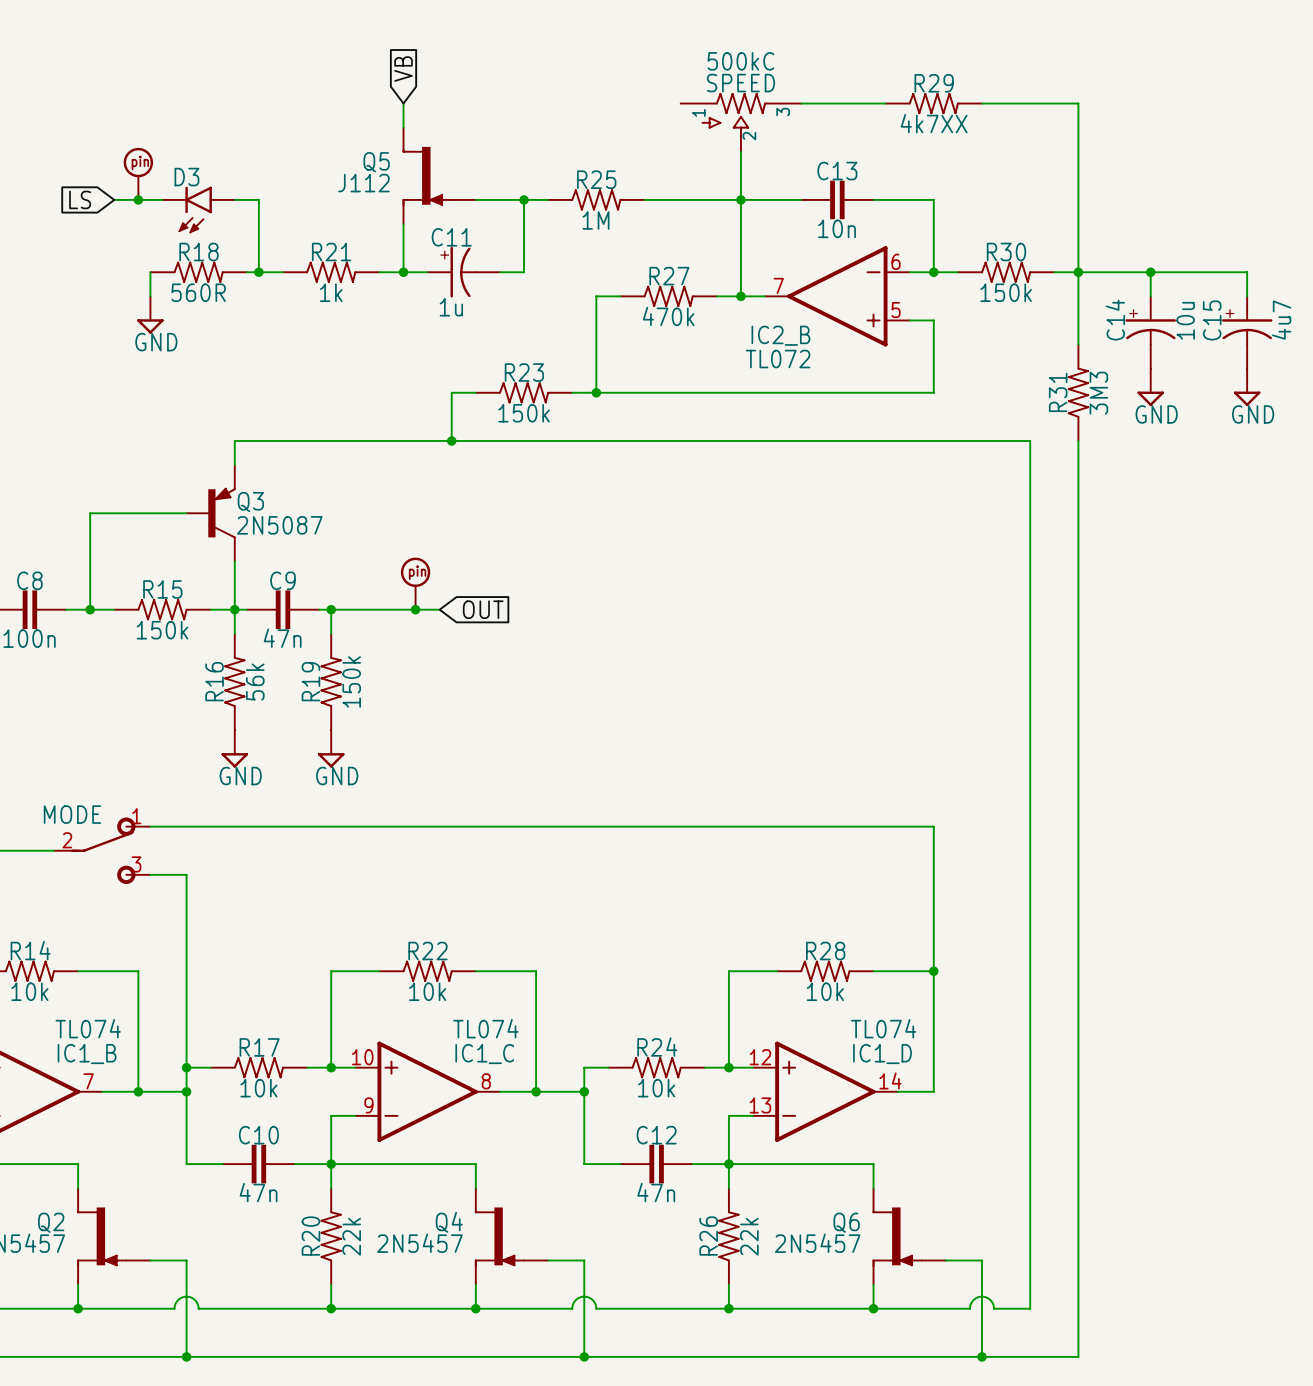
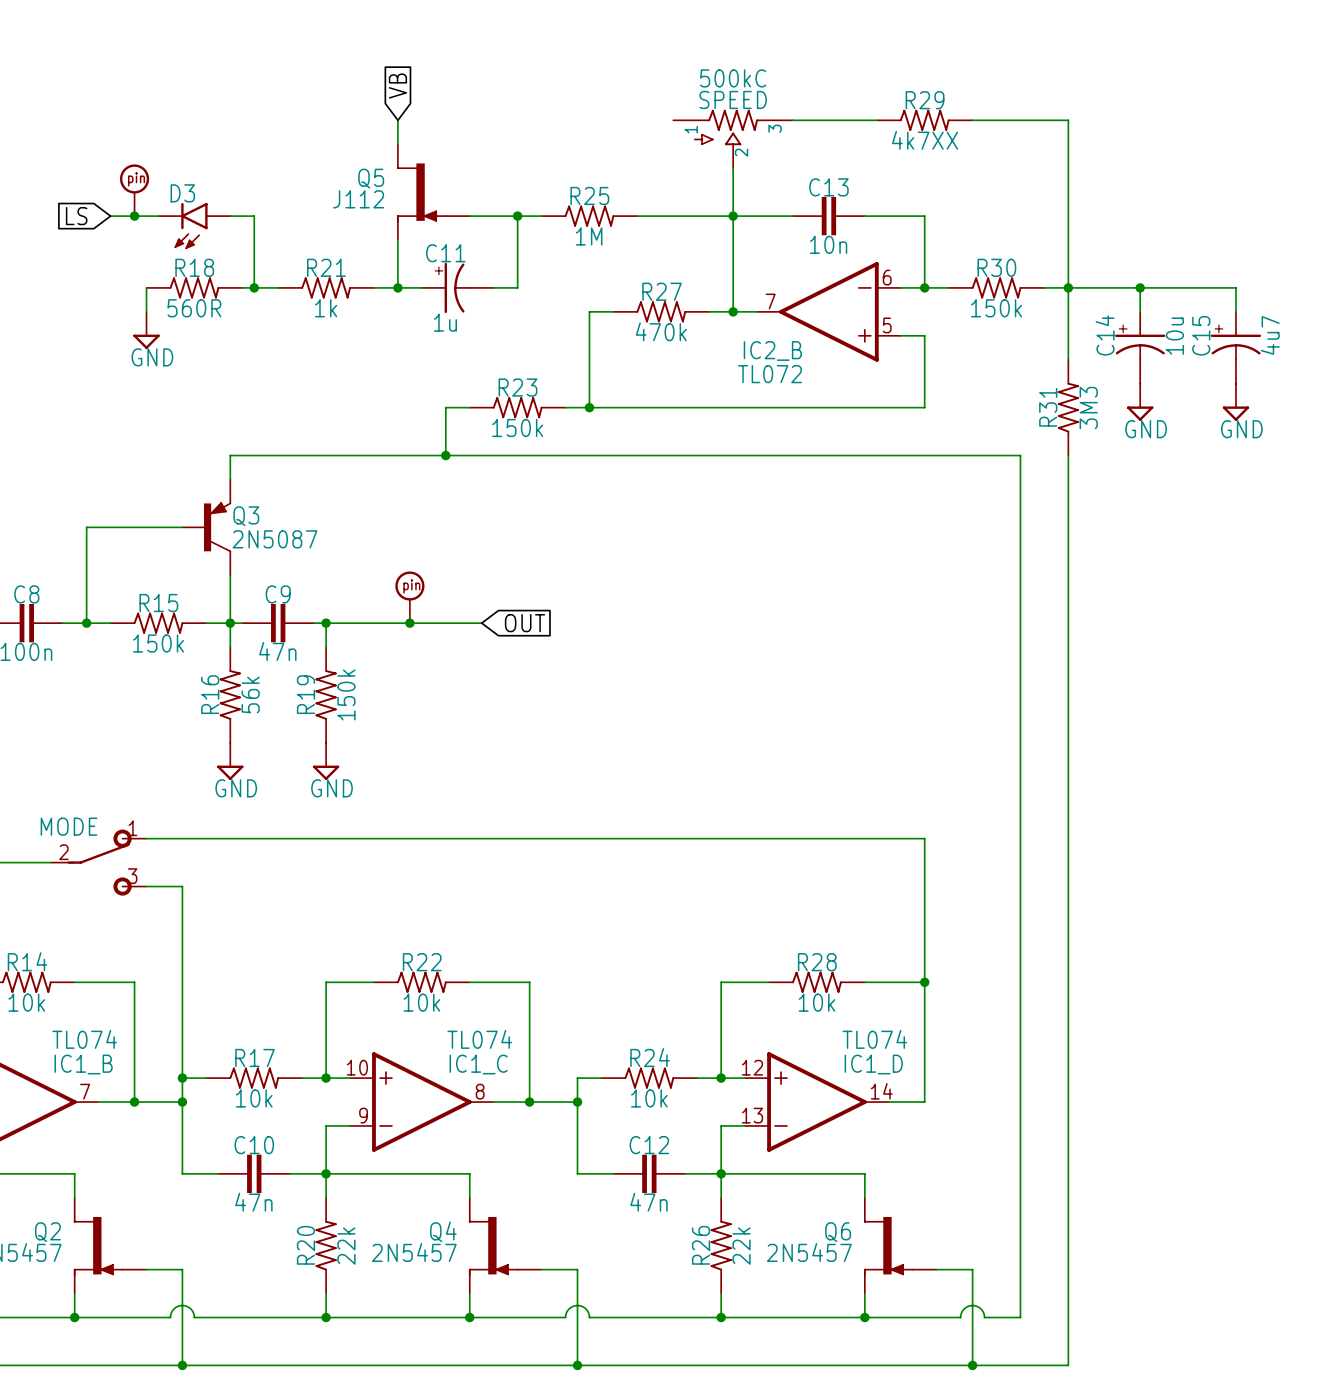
wire: none -> (433, 623) (481, 623)
global label position: OUT (483, 609) -> OUT (524, 623)

